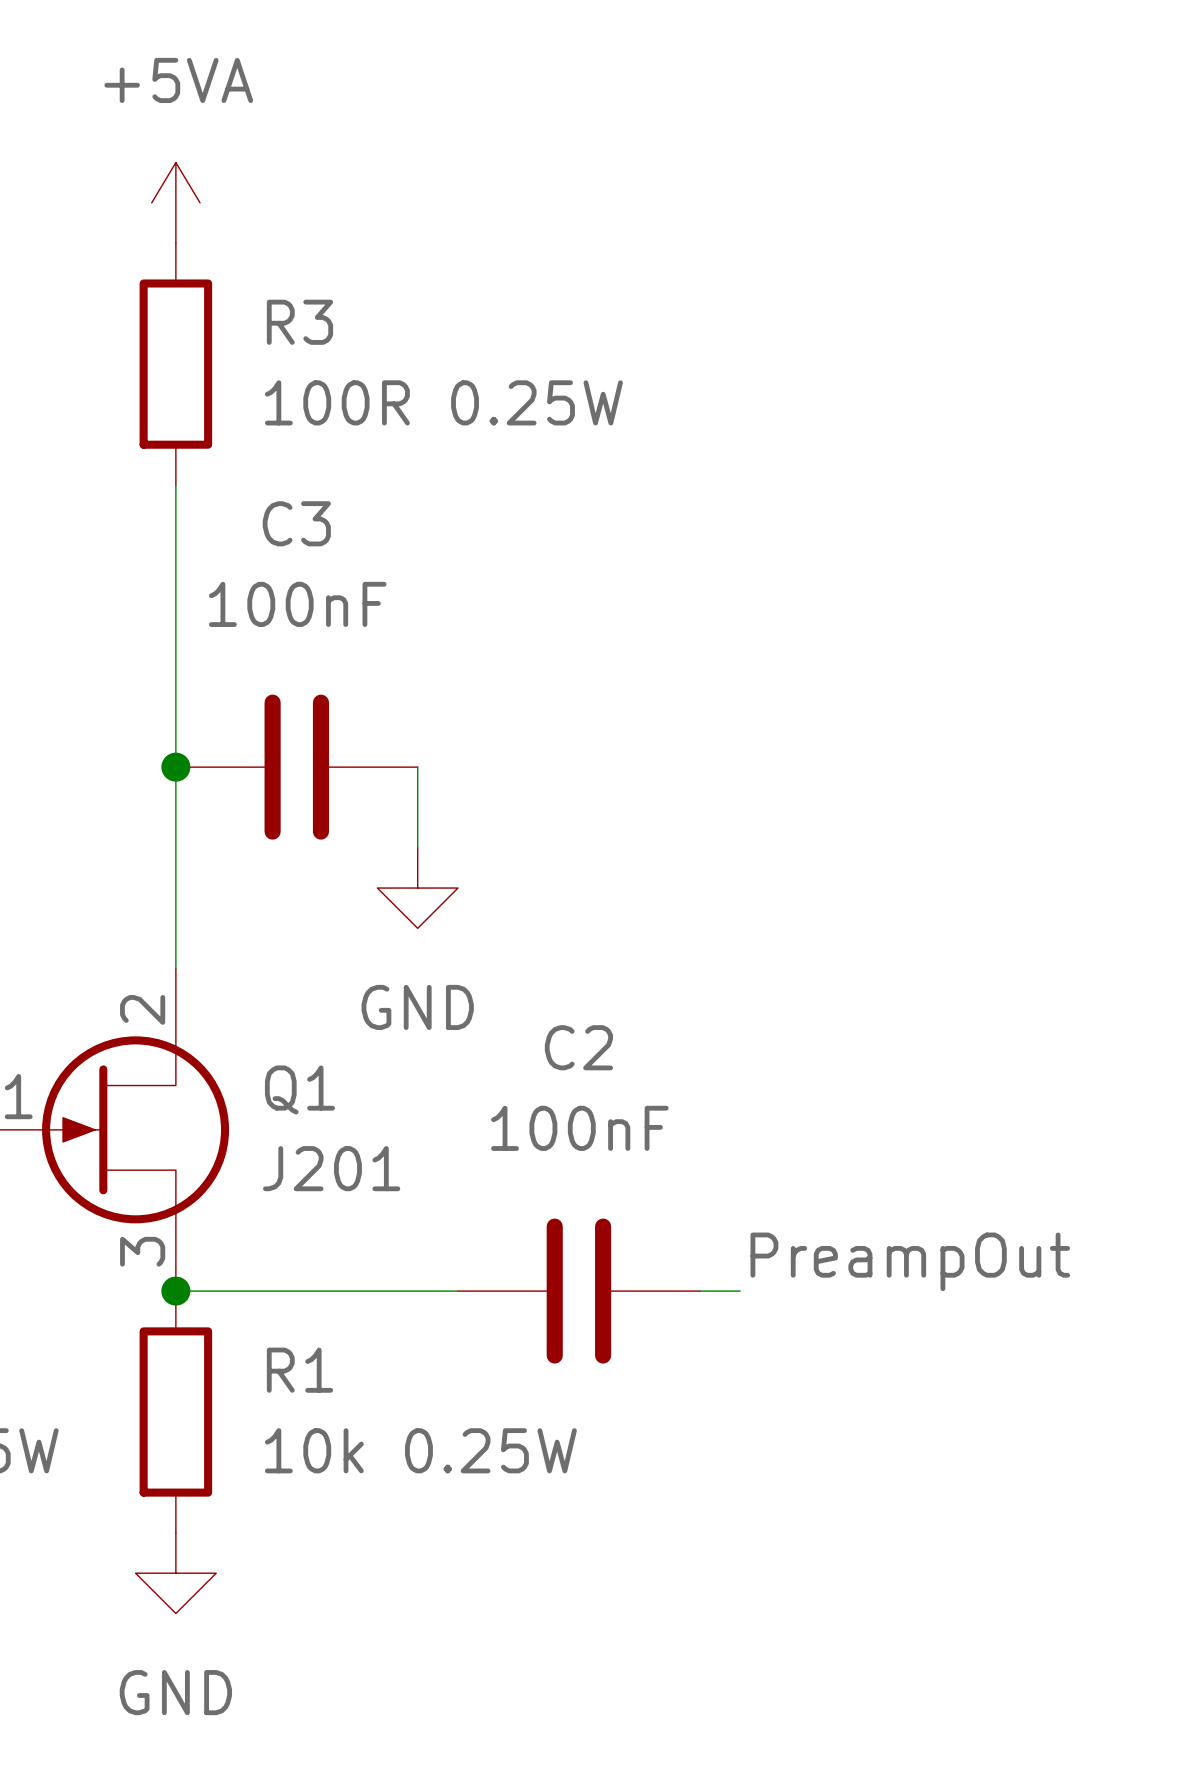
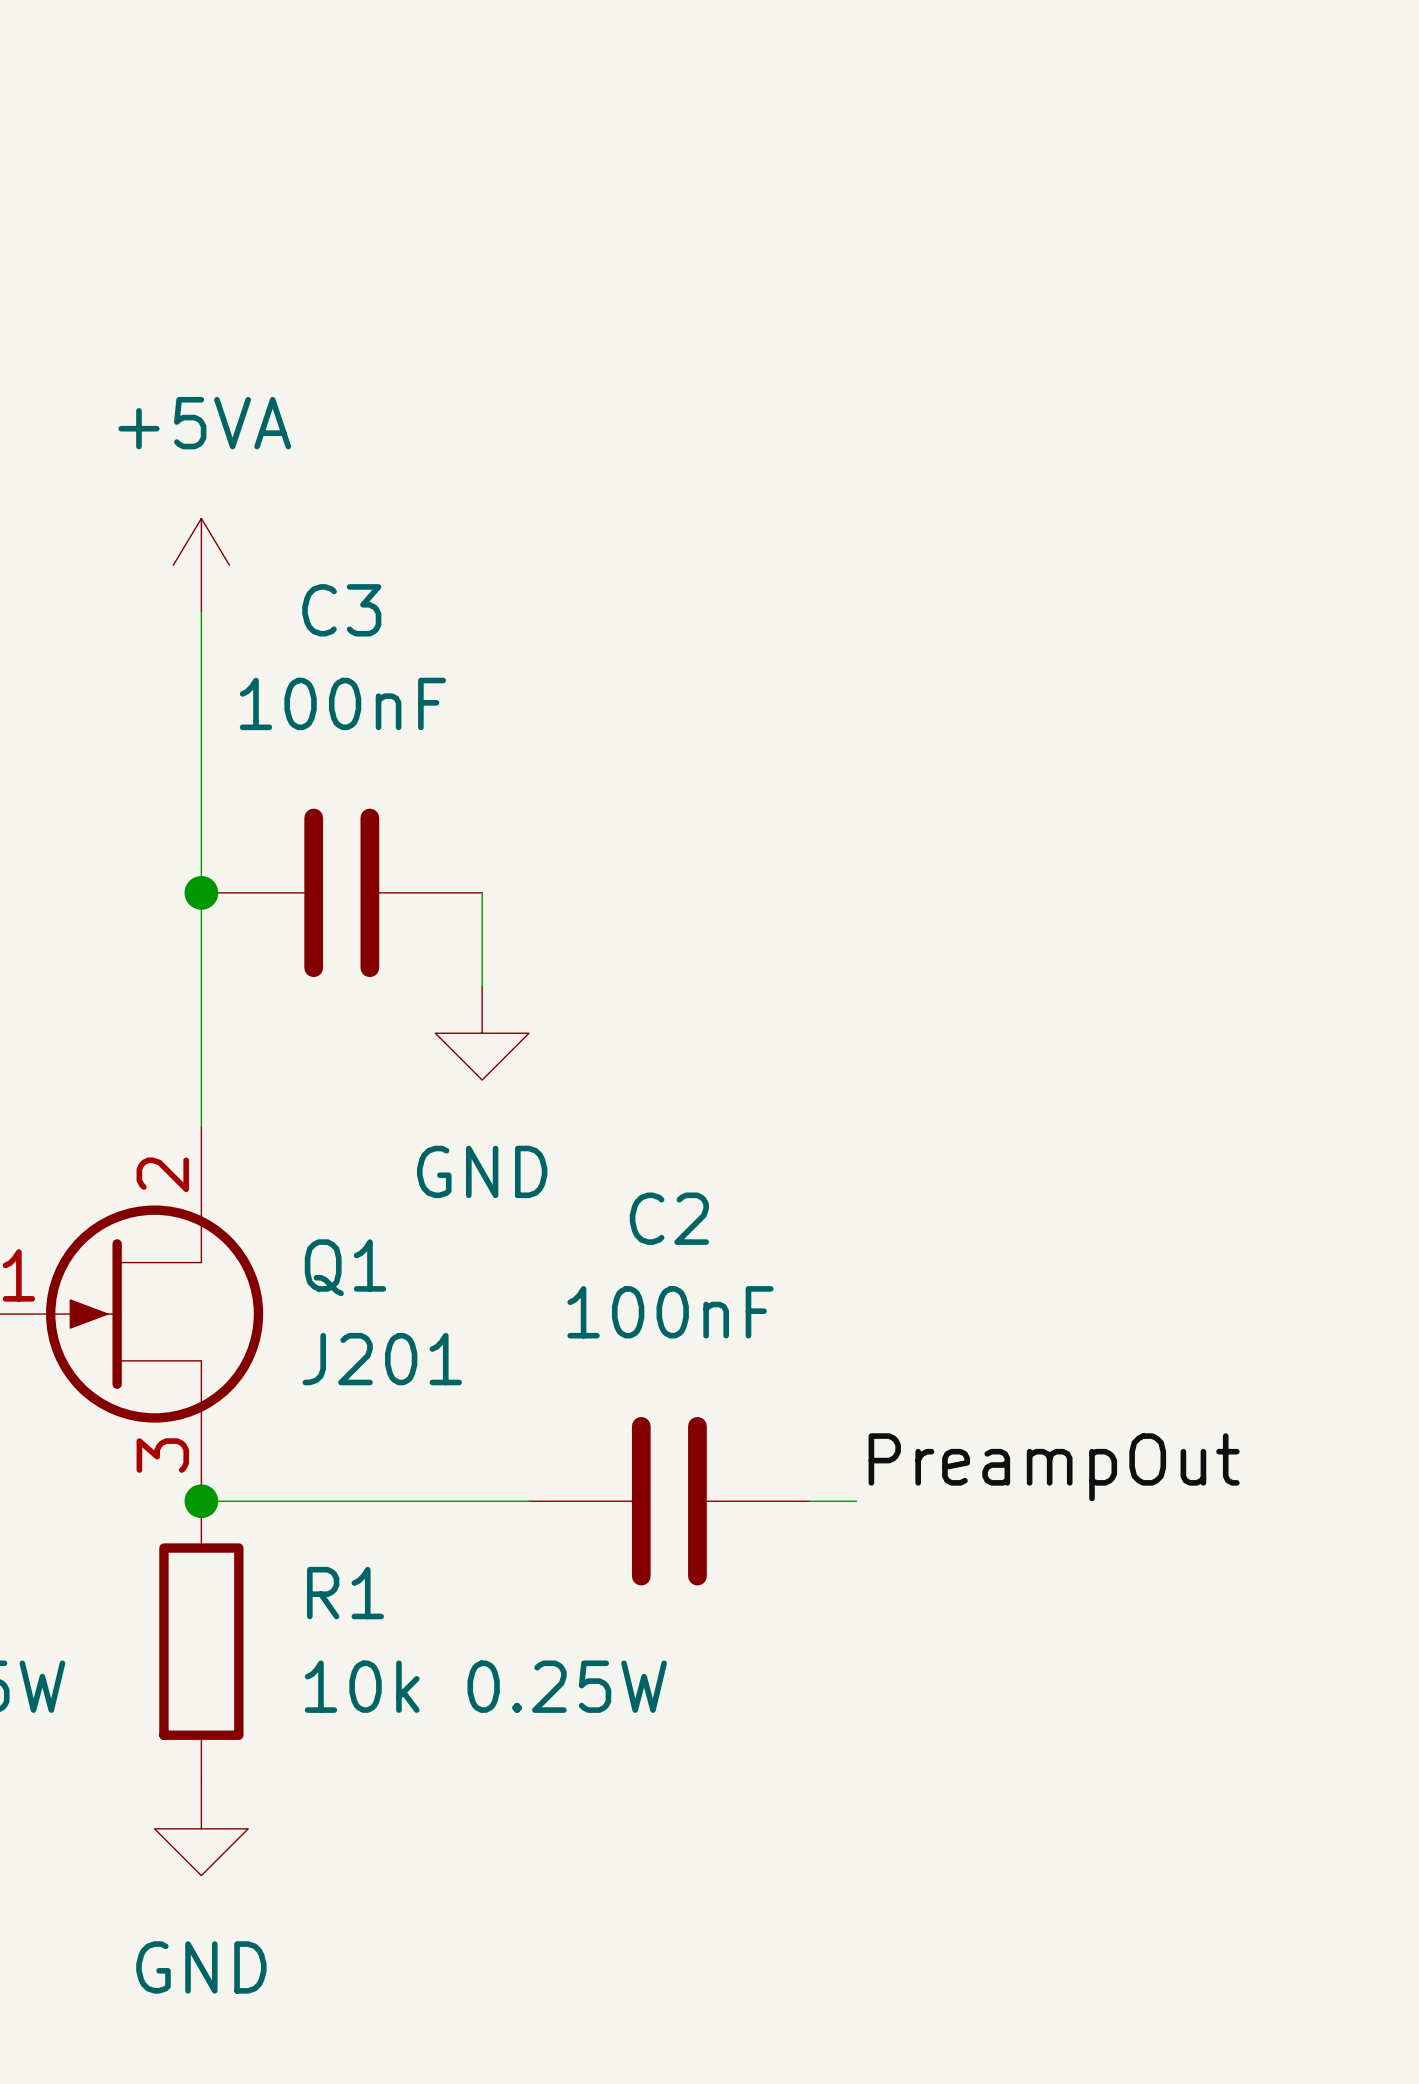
power symbol position: +5VA (175, 202) -> +5VA (201, 565)
R3: 100R 0.25W (175, 364) -> none

